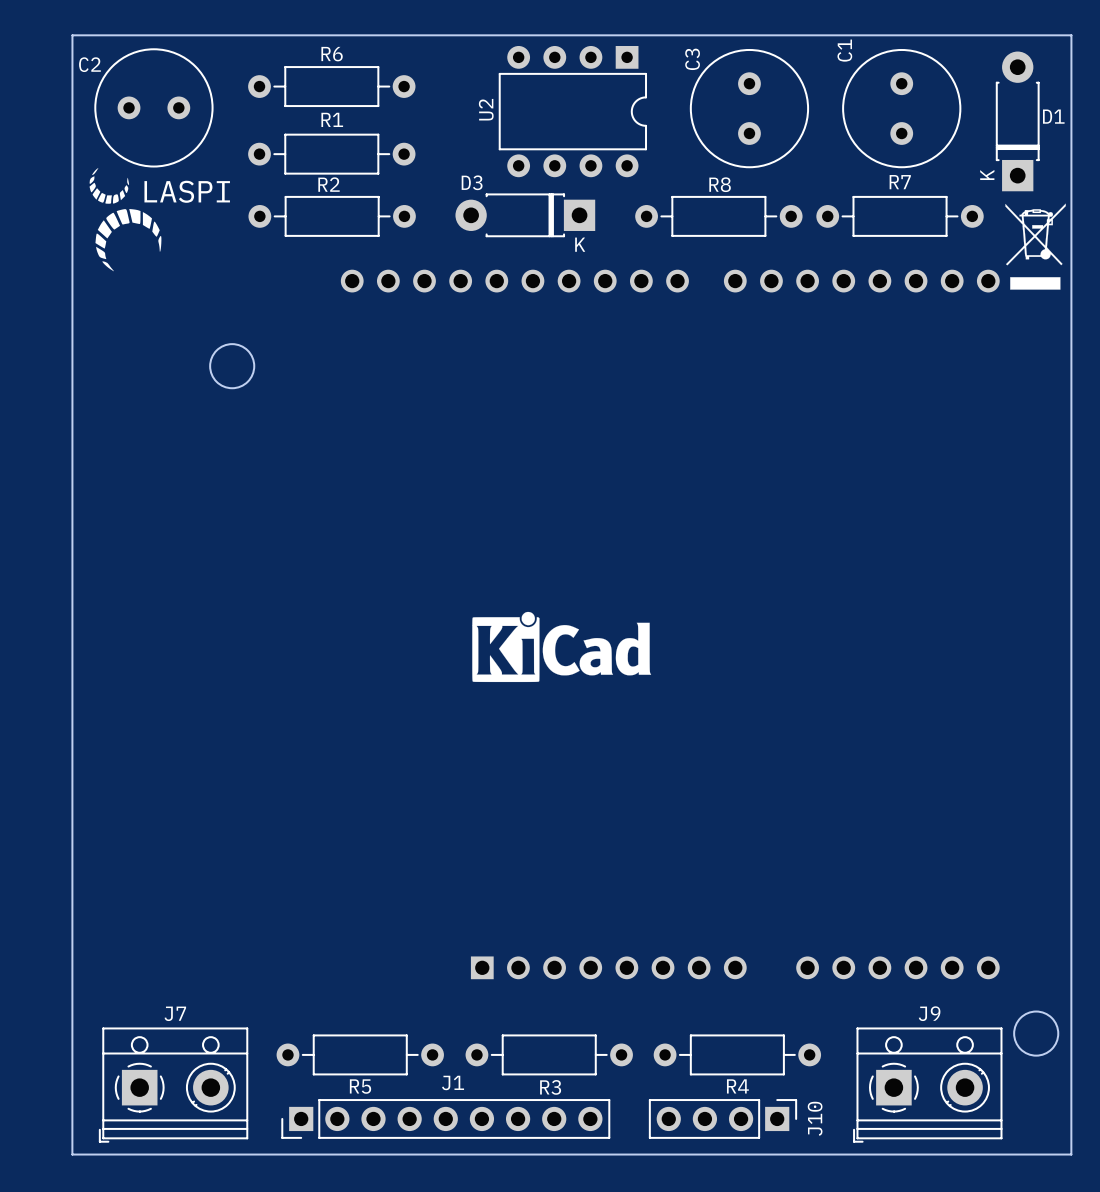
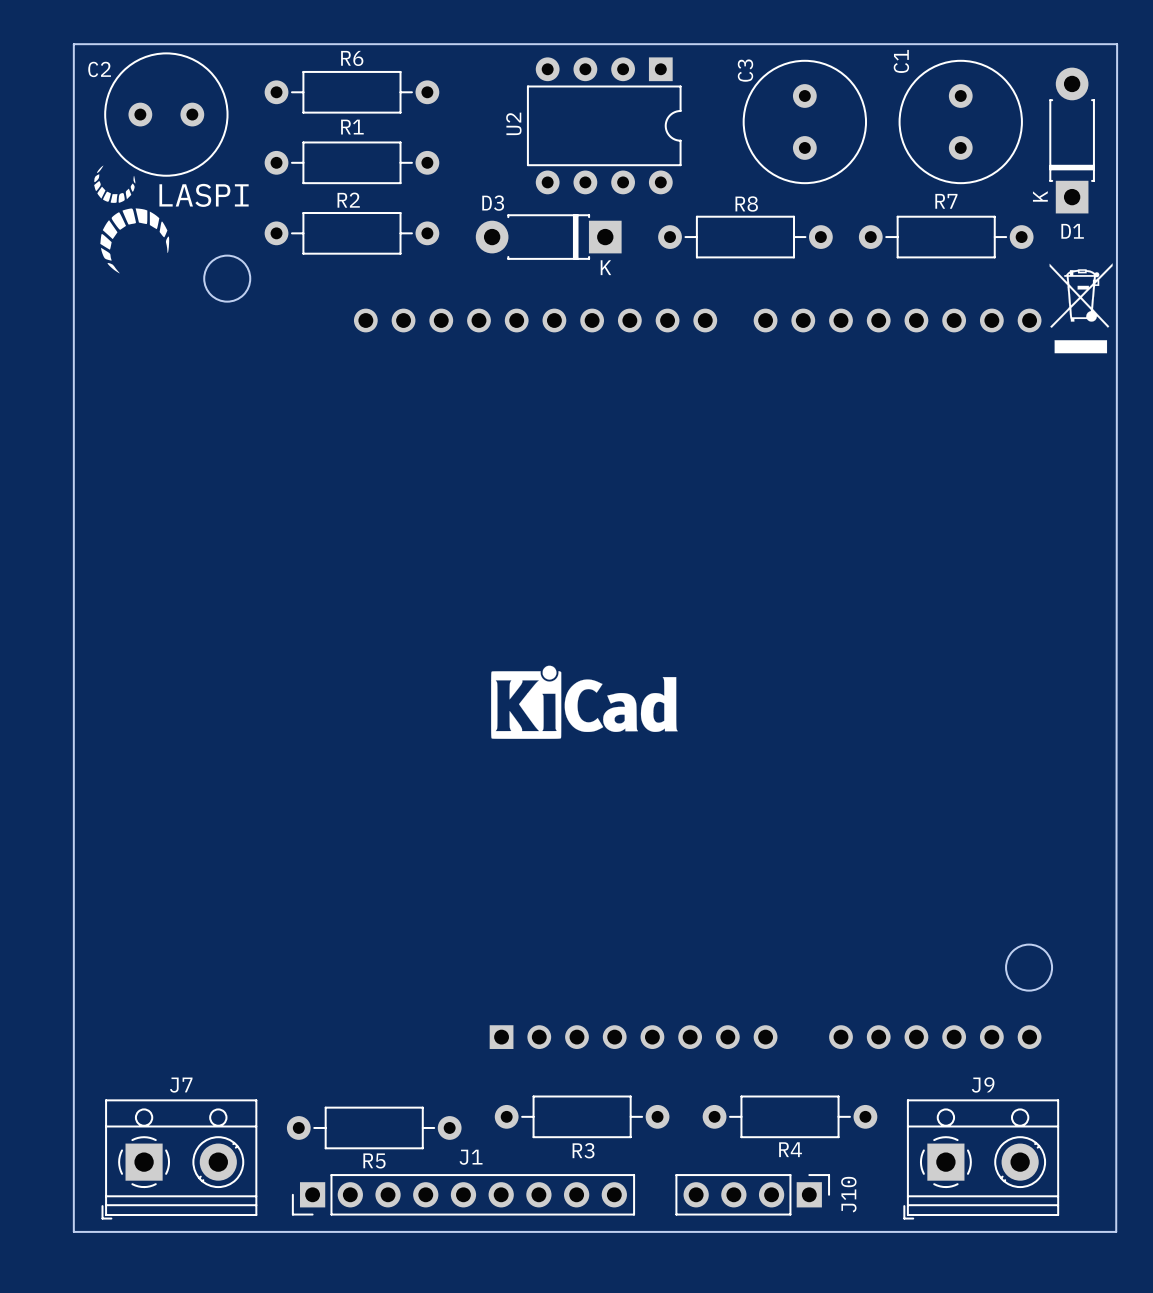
R6 position: (331, 86) -> (351, 92)
C2 position: (153, 107) -> (166, 114)
C3 position: (749, 108) -> (804, 121)
C1 position: (901, 108) -> (960, 121)
U2 position: (572, 111) -> (604, 125)
D1 name position: D1 (1053, 116) -> D1 (1072, 231)
D1 position: (1017, 121) -> (1072, 140)
R1 position: (331, 154) -> (351, 162)
text position: LASPI (187, 191) -> LASPI (204, 195)
D3 position: (525, 215) -> (548, 237)
R2 position: (332, 216) -> (351, 233)
R8 position: (718, 216) -> (745, 237)
R7 position: (900, 216) -> (946, 237)
drawing position: (125, 219) -> (131, 219)
drawing position: (1035, 246) -> (1081, 308)
round board edge position: (232, 366) -> (227, 278)
round board edge position: (1036, 1033) -> (1029, 967)
R3 position: (549, 1054) -> (582, 1116)
R4 position: (737, 1054) -> (789, 1116)
J9 position: (927, 1085) -> (981, 1159)
board edge: (72, 1154) (72, 35) (1071, 35) (1071, 1154) -> (73, 1231) (73, 44) (1117, 44) (1116, 1231)

